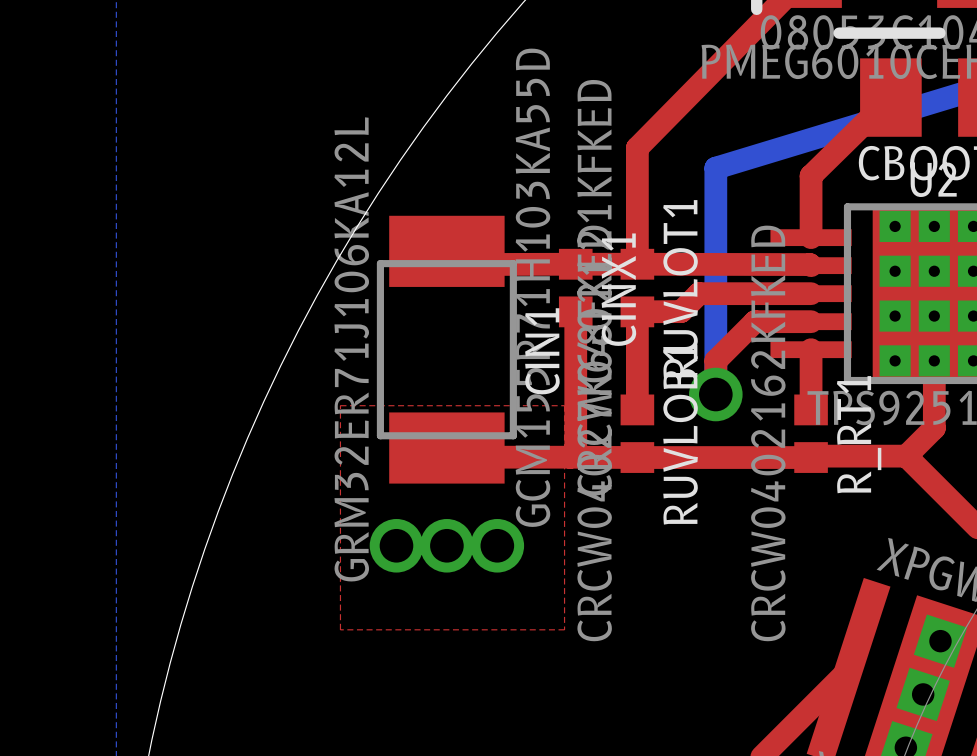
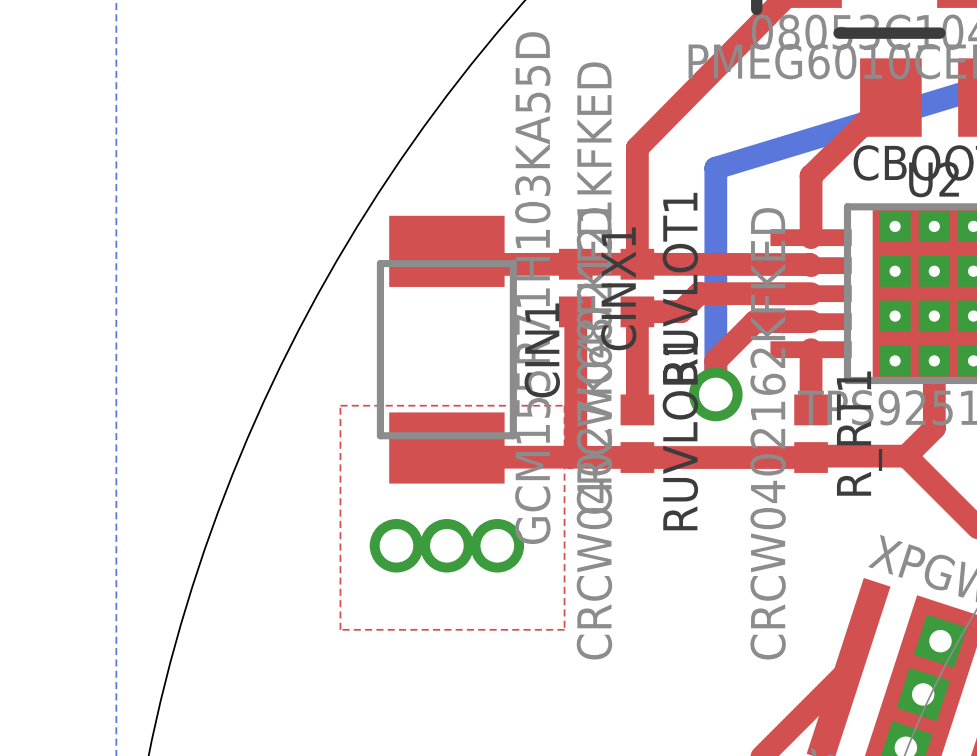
CIN1 value: GRM32ER71J106KA12L (351, 349) -> none

